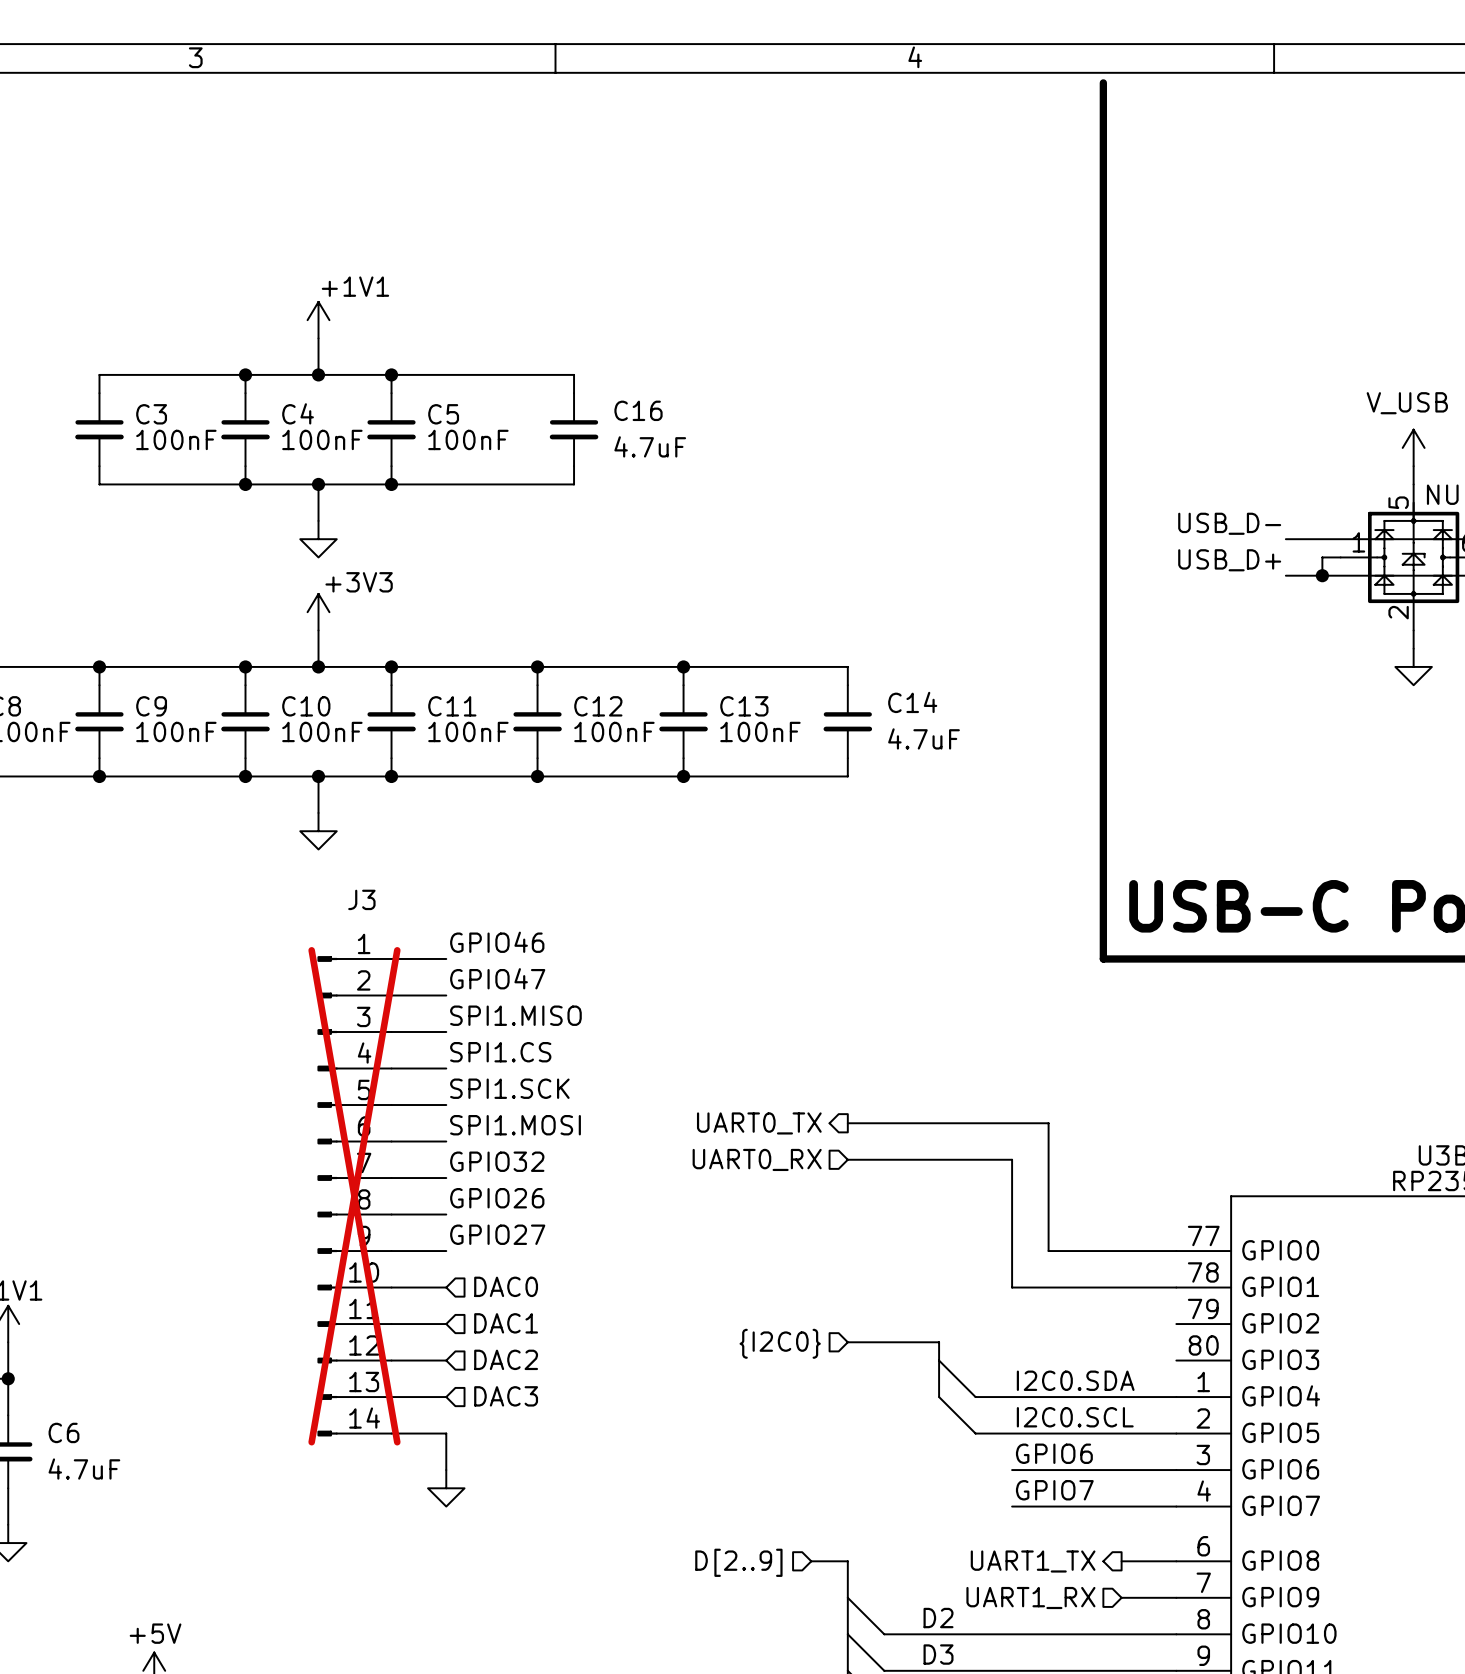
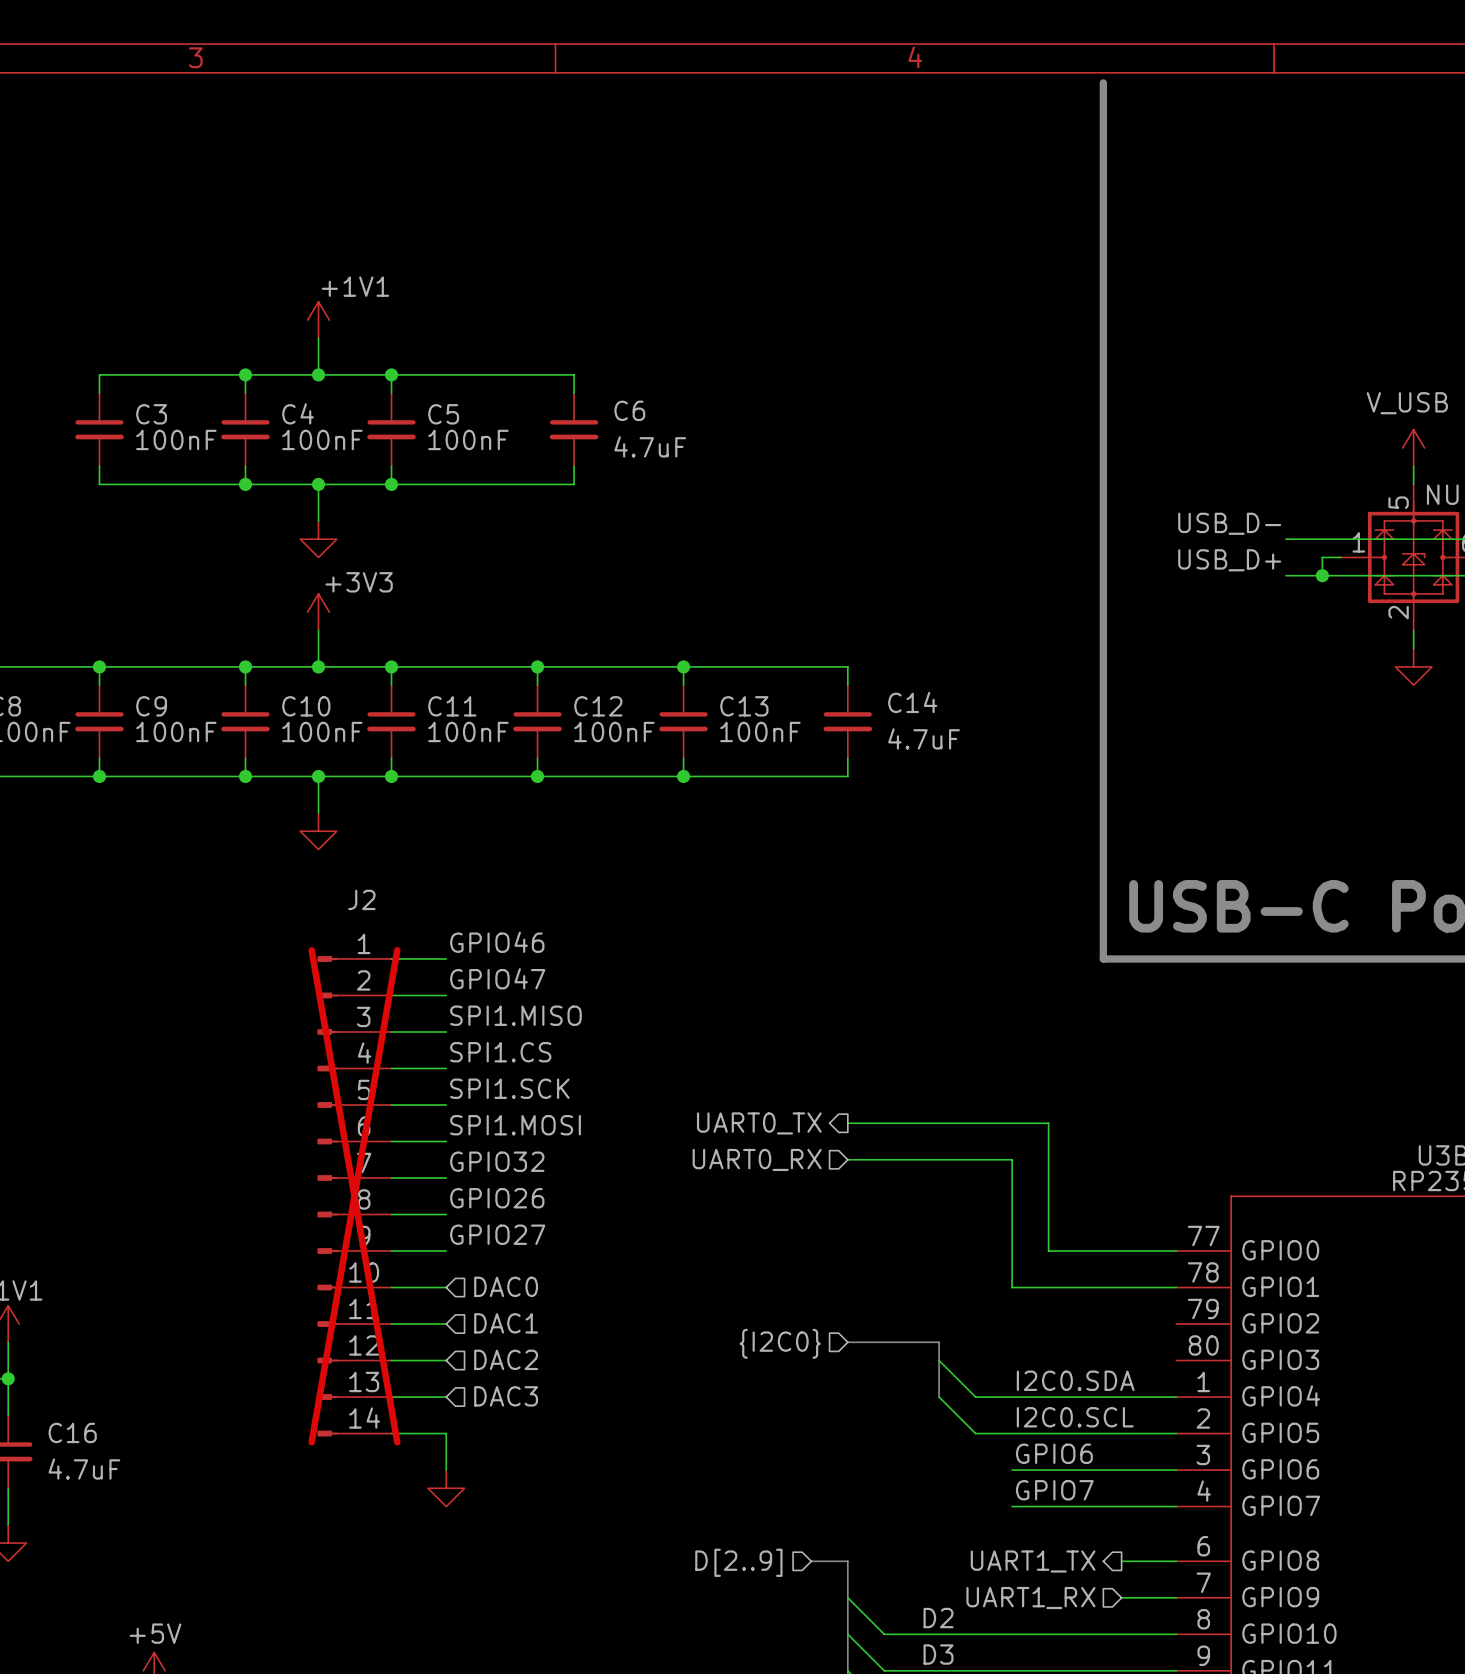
C16 name: C16 (638, 410) -> C6 (629, 410)
J3 name: J3 (361, 899) -> J2 (361, 899)
C6 name: C6 (63, 1432) -> C16 (72, 1432)

